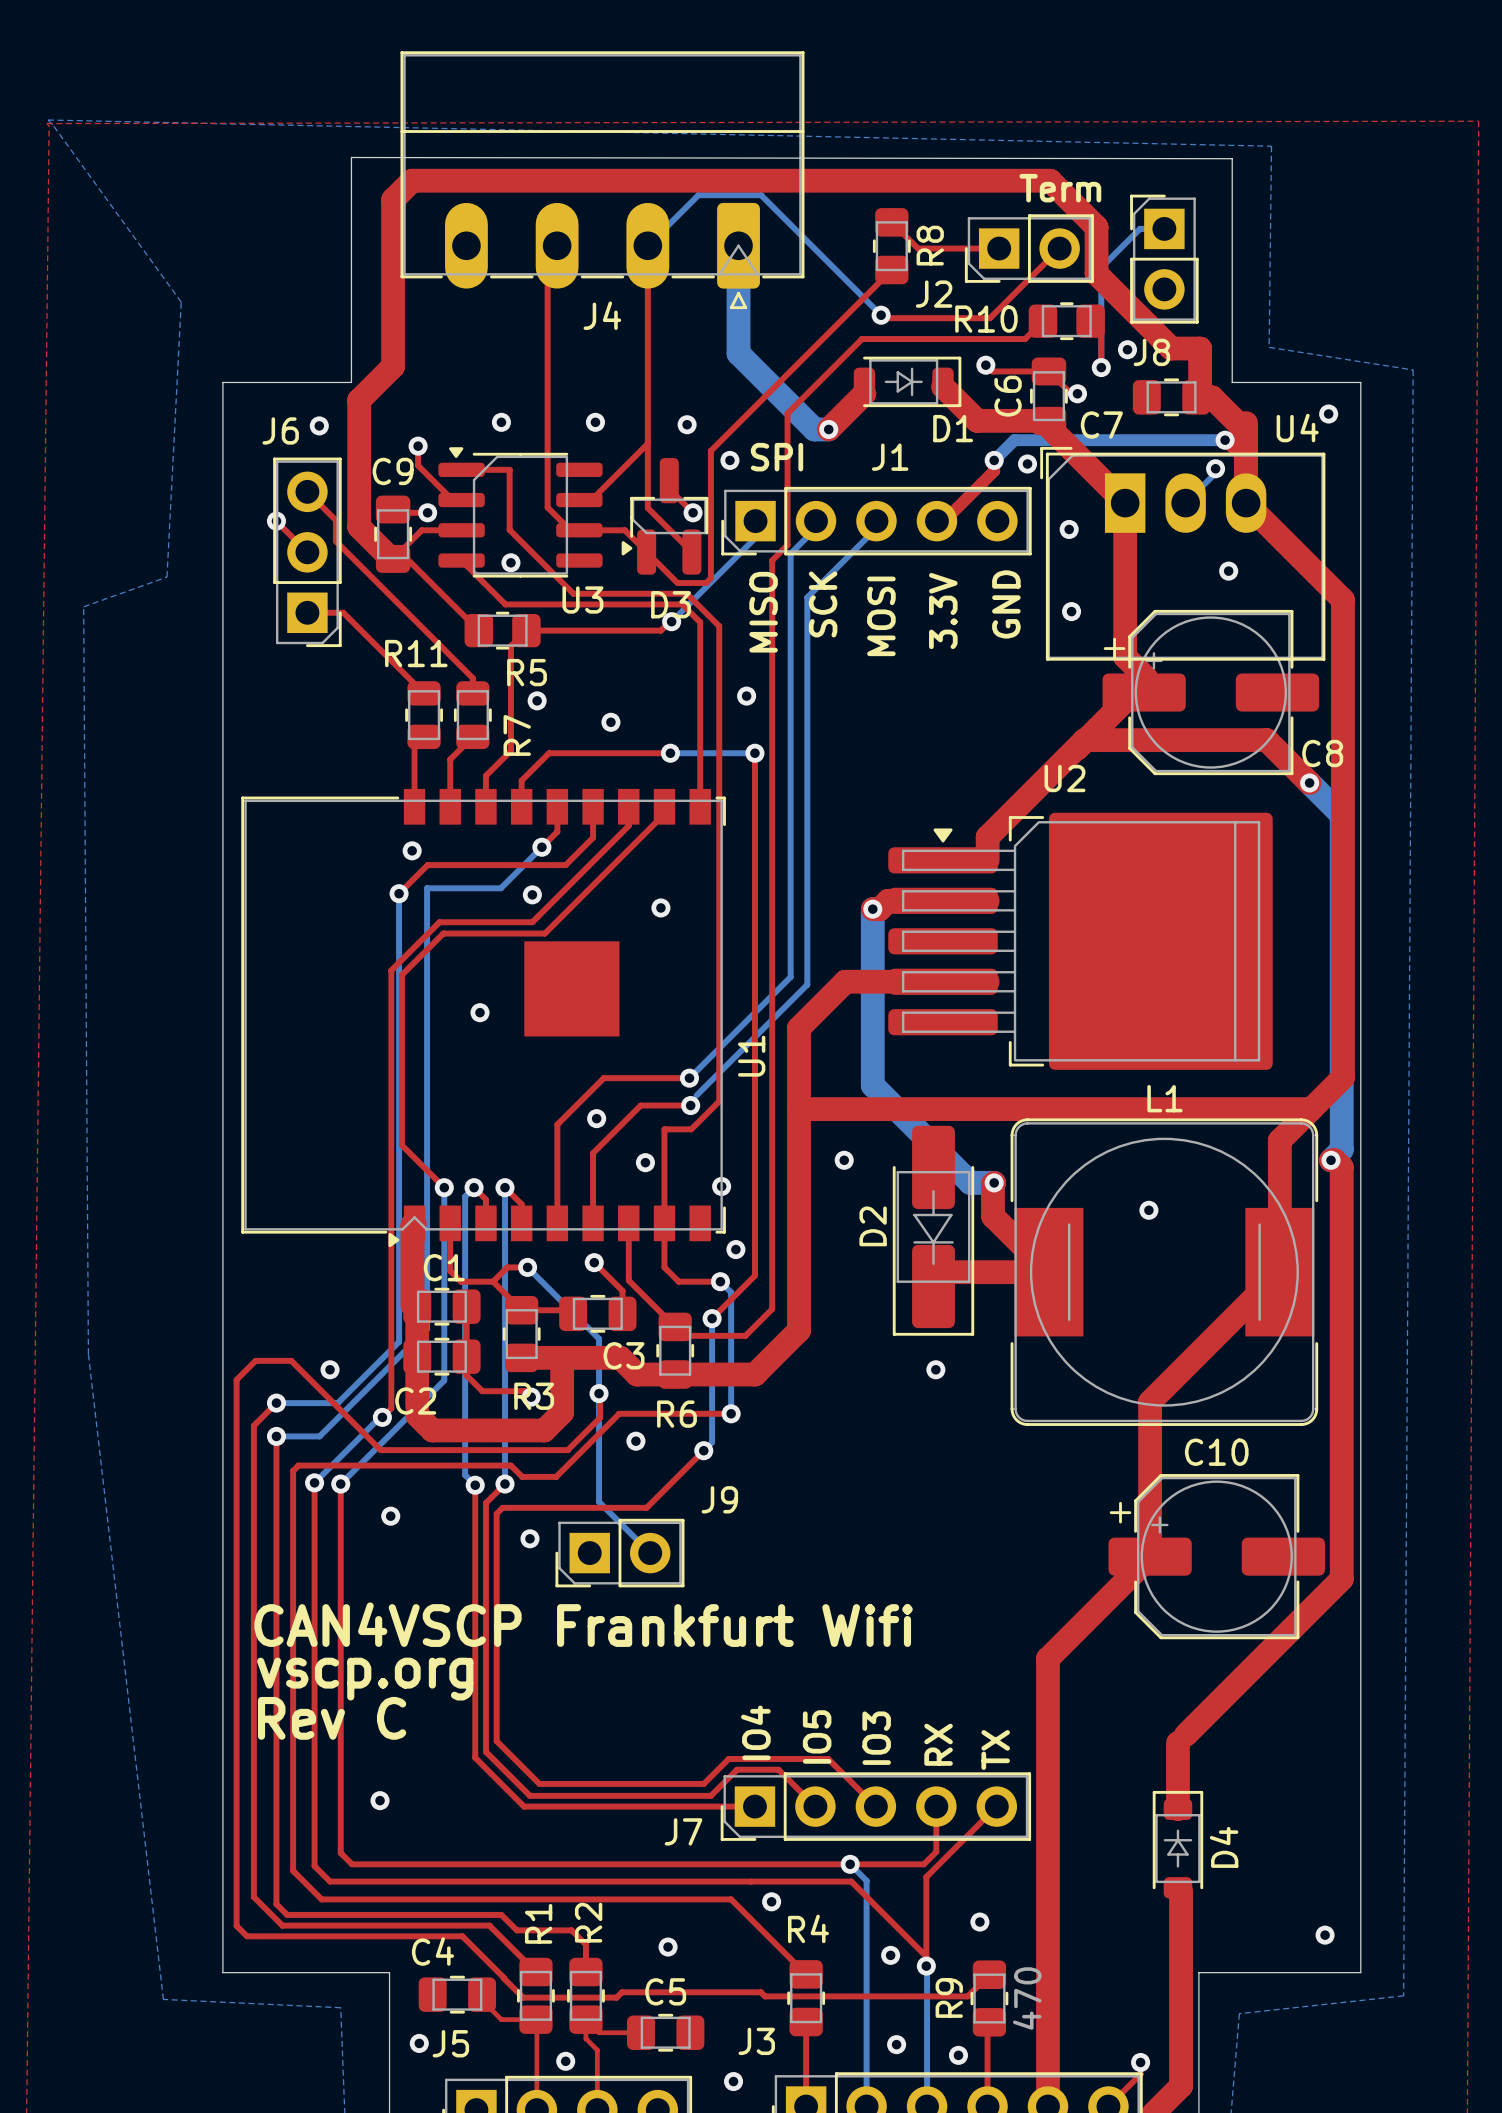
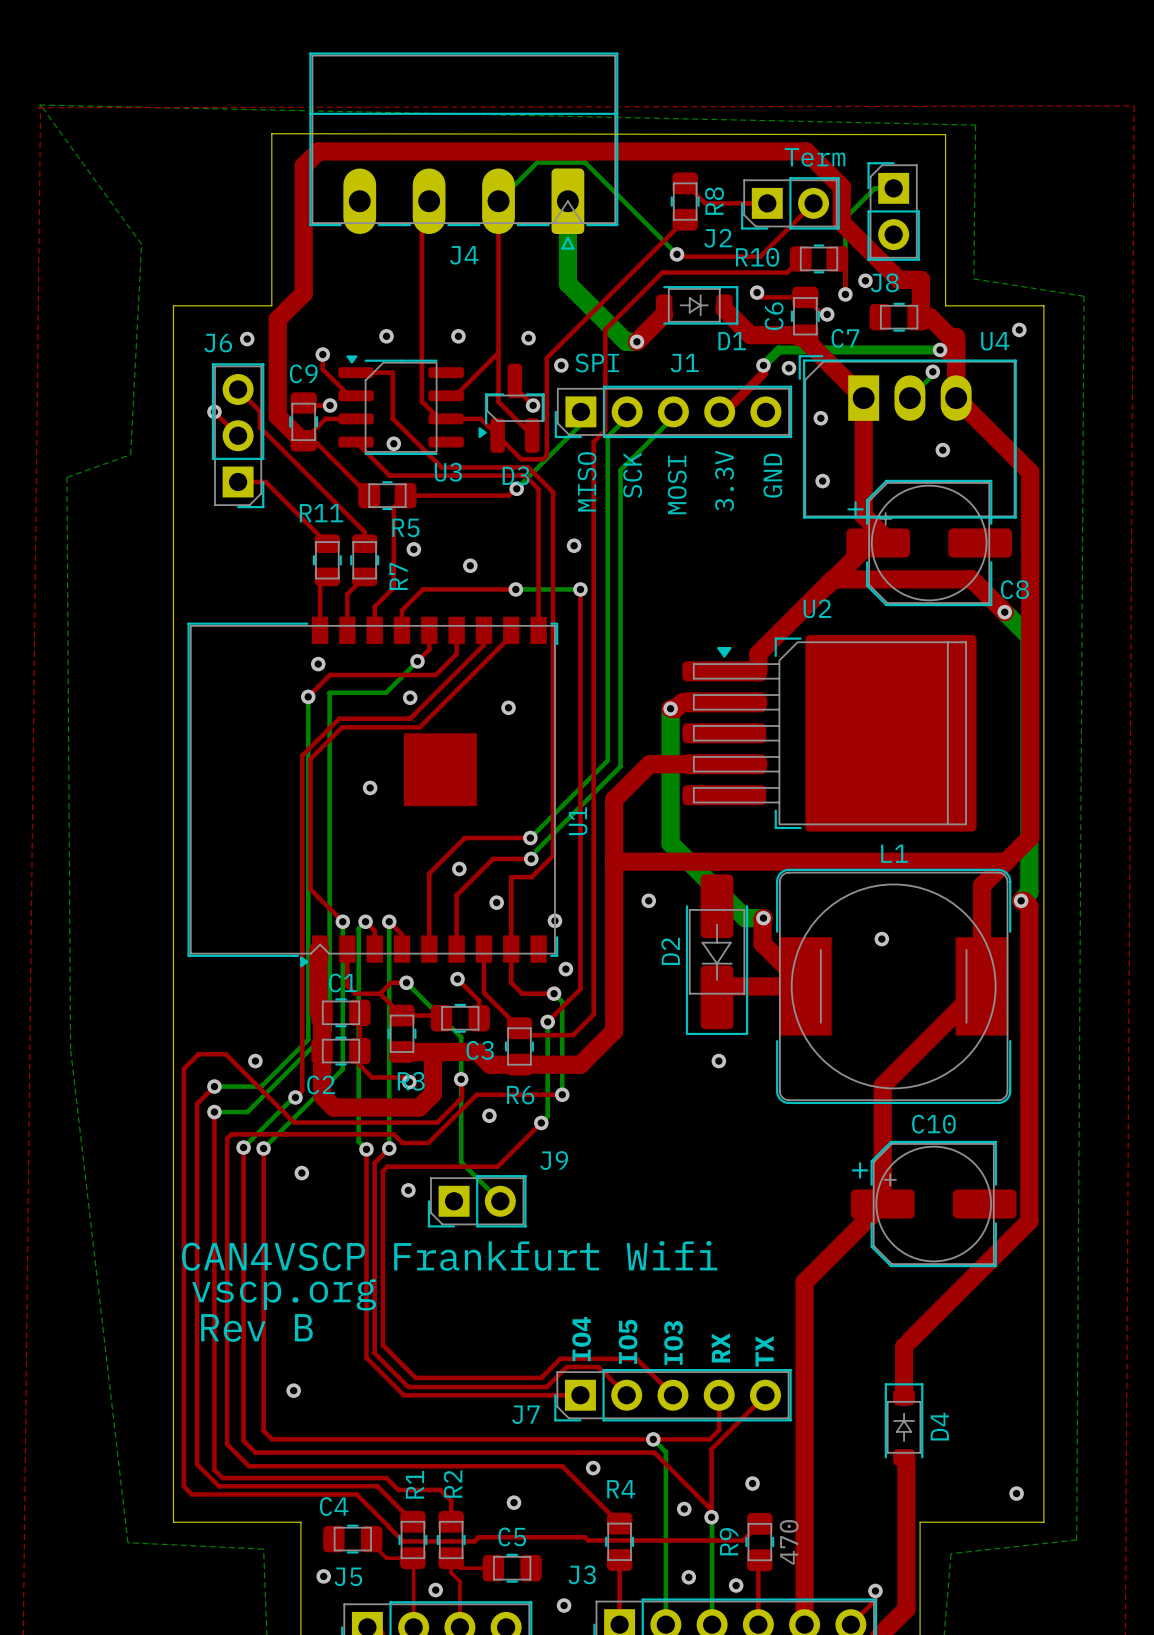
text: Rev C (332, 1718) -> Rev B (256, 1327)

